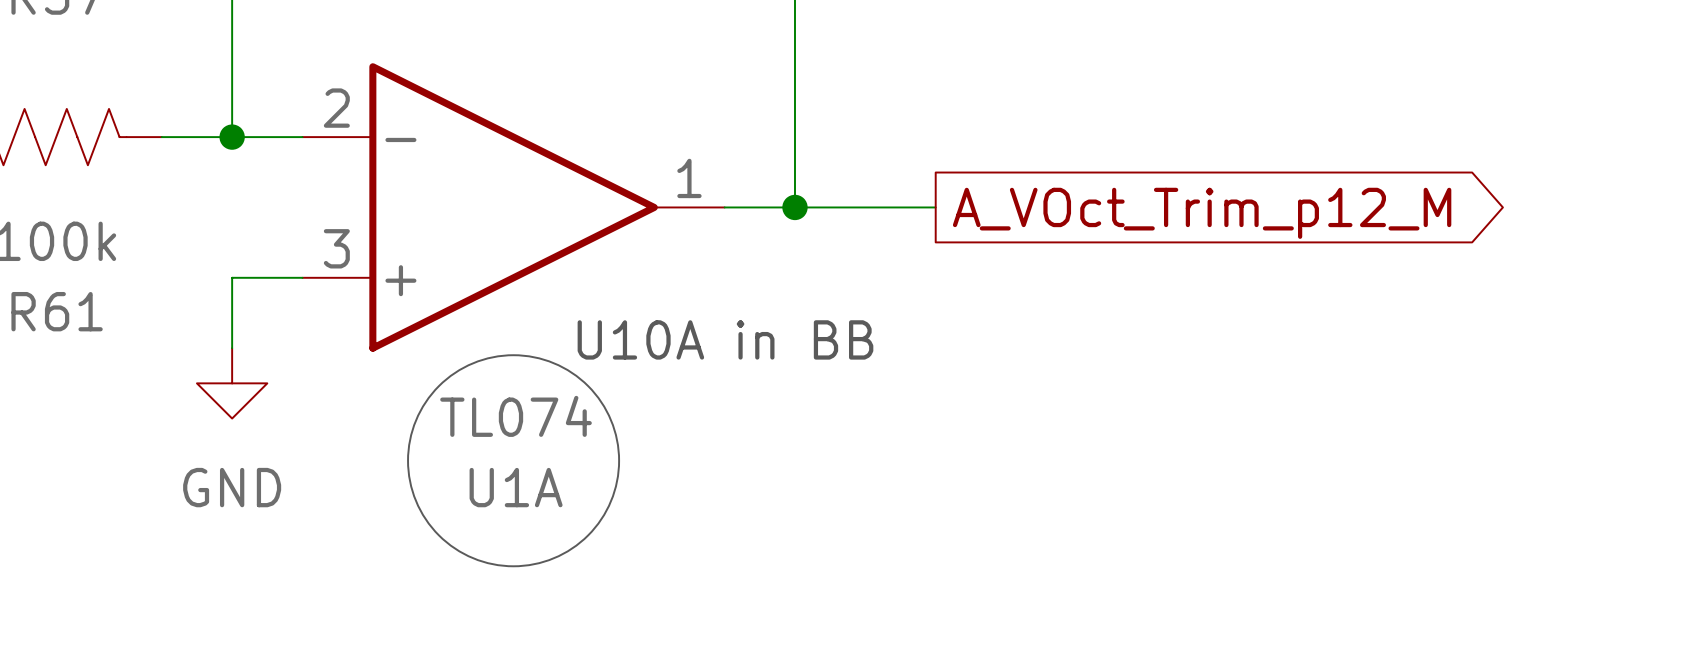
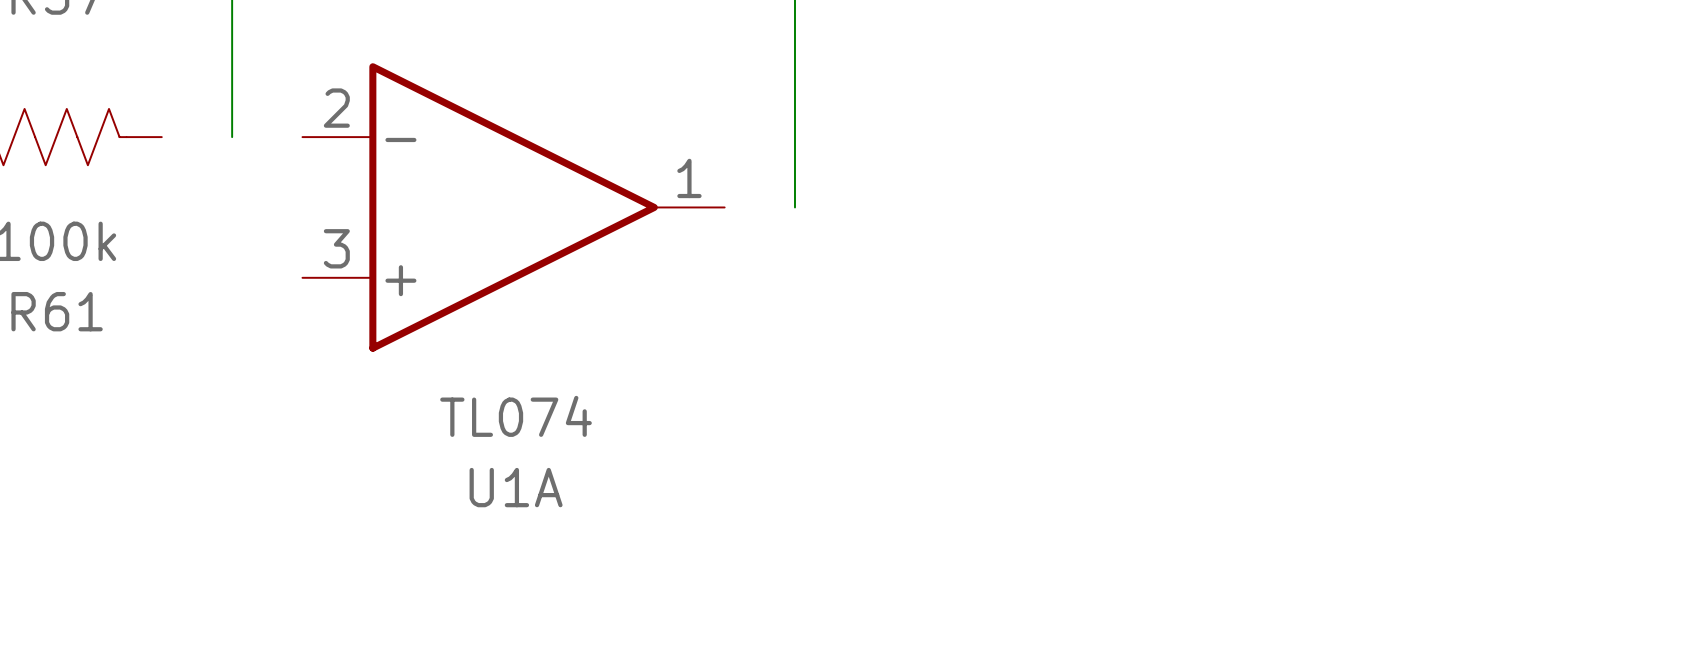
wire: (161, 137) (302, 137) -> none
junction: (232, 137) -> none
wire: (724, 207) (935, 207) -> none
junction: (794, 207) -> none
global label: A_VOct_Trim_p12_M (1202, 213) -> none
wire: (302, 277) (232, 277) (232, 348) -> none
text: U10A in BB (725, 339) -> none
drawing: [408, 355, 620, 567] -> none
power symbol: GND (232, 383) -> none

